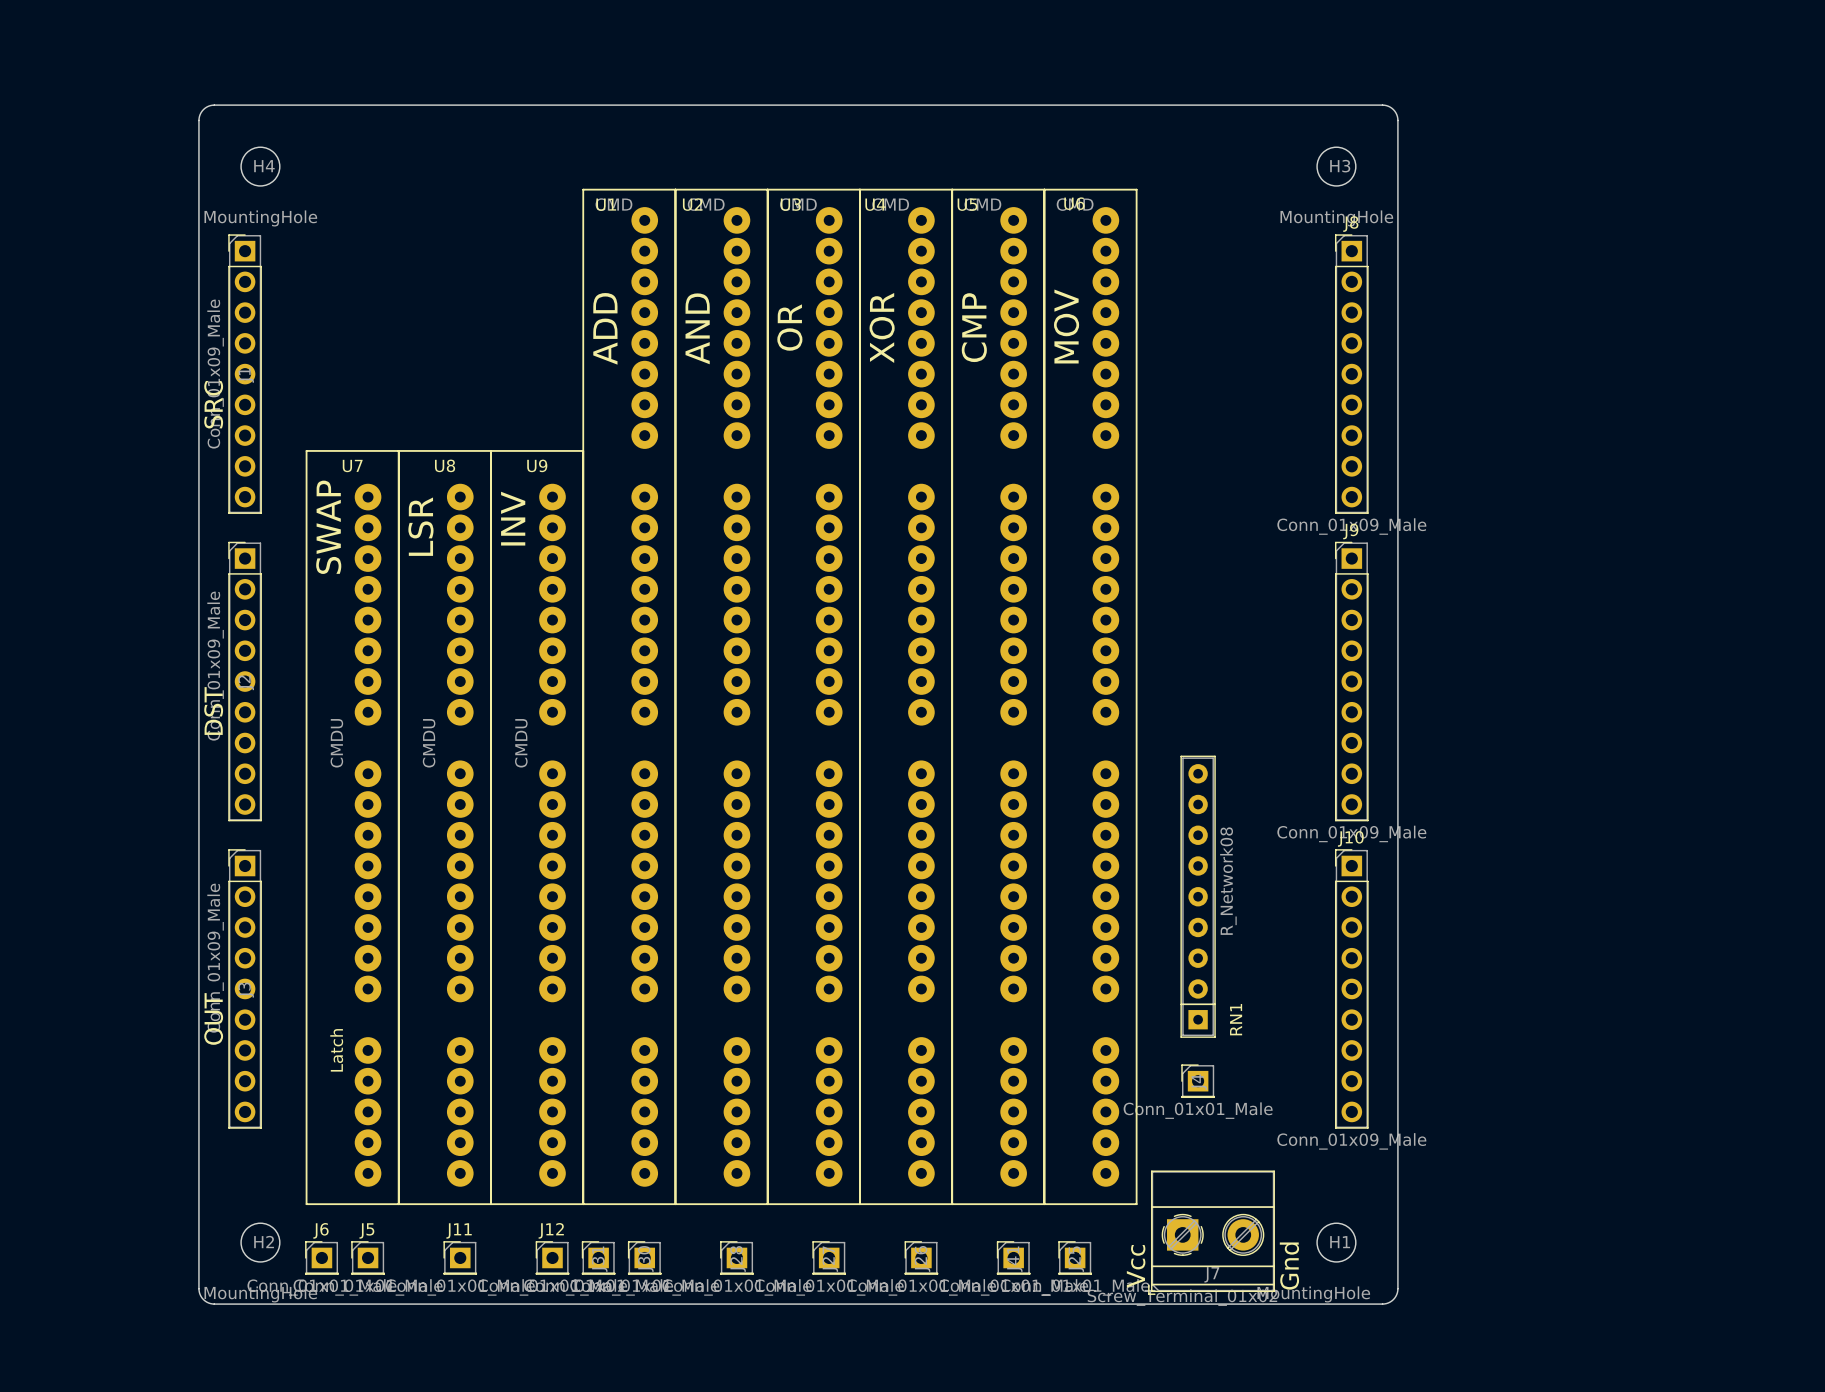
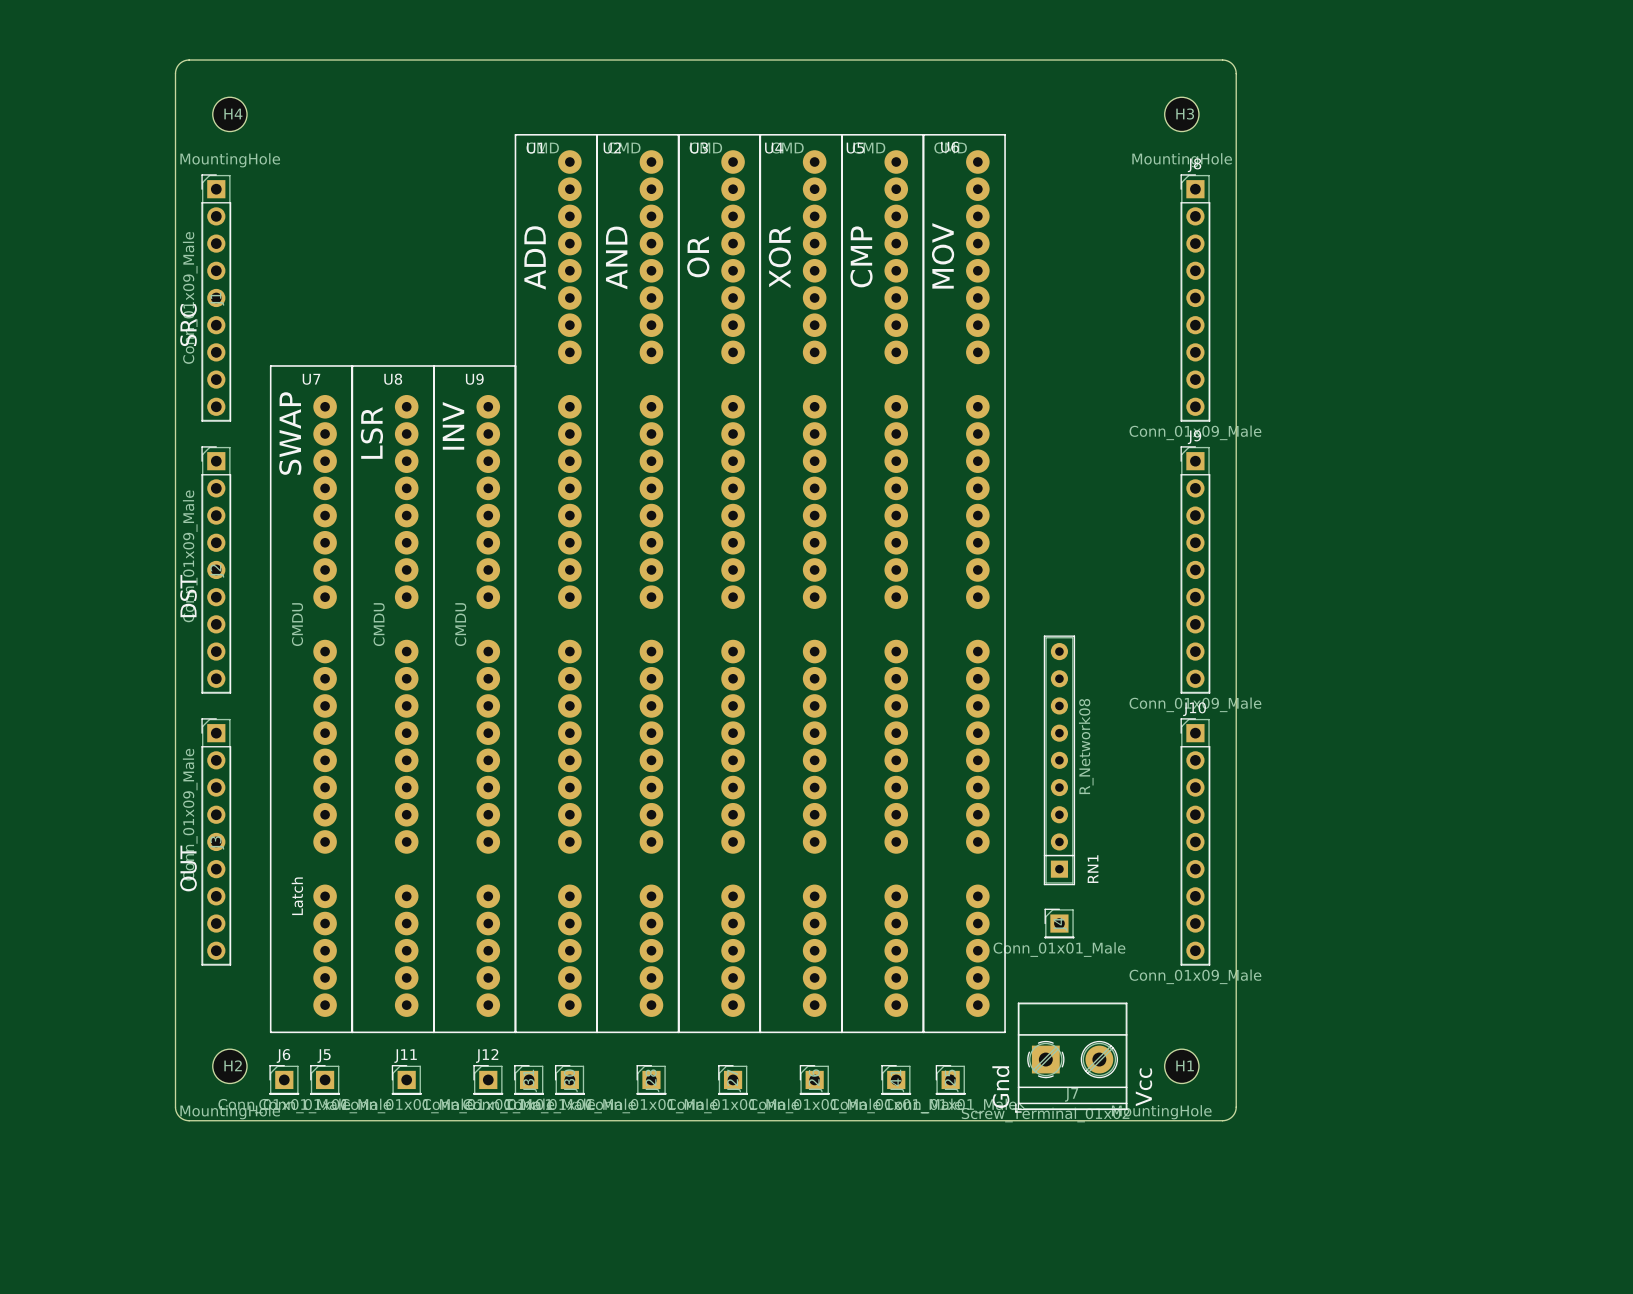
text: Vcc (1136, 1266) -> Gnd (1000, 1087)
text: Gnd (1289, 1266) -> Vcc (1143, 1087)

